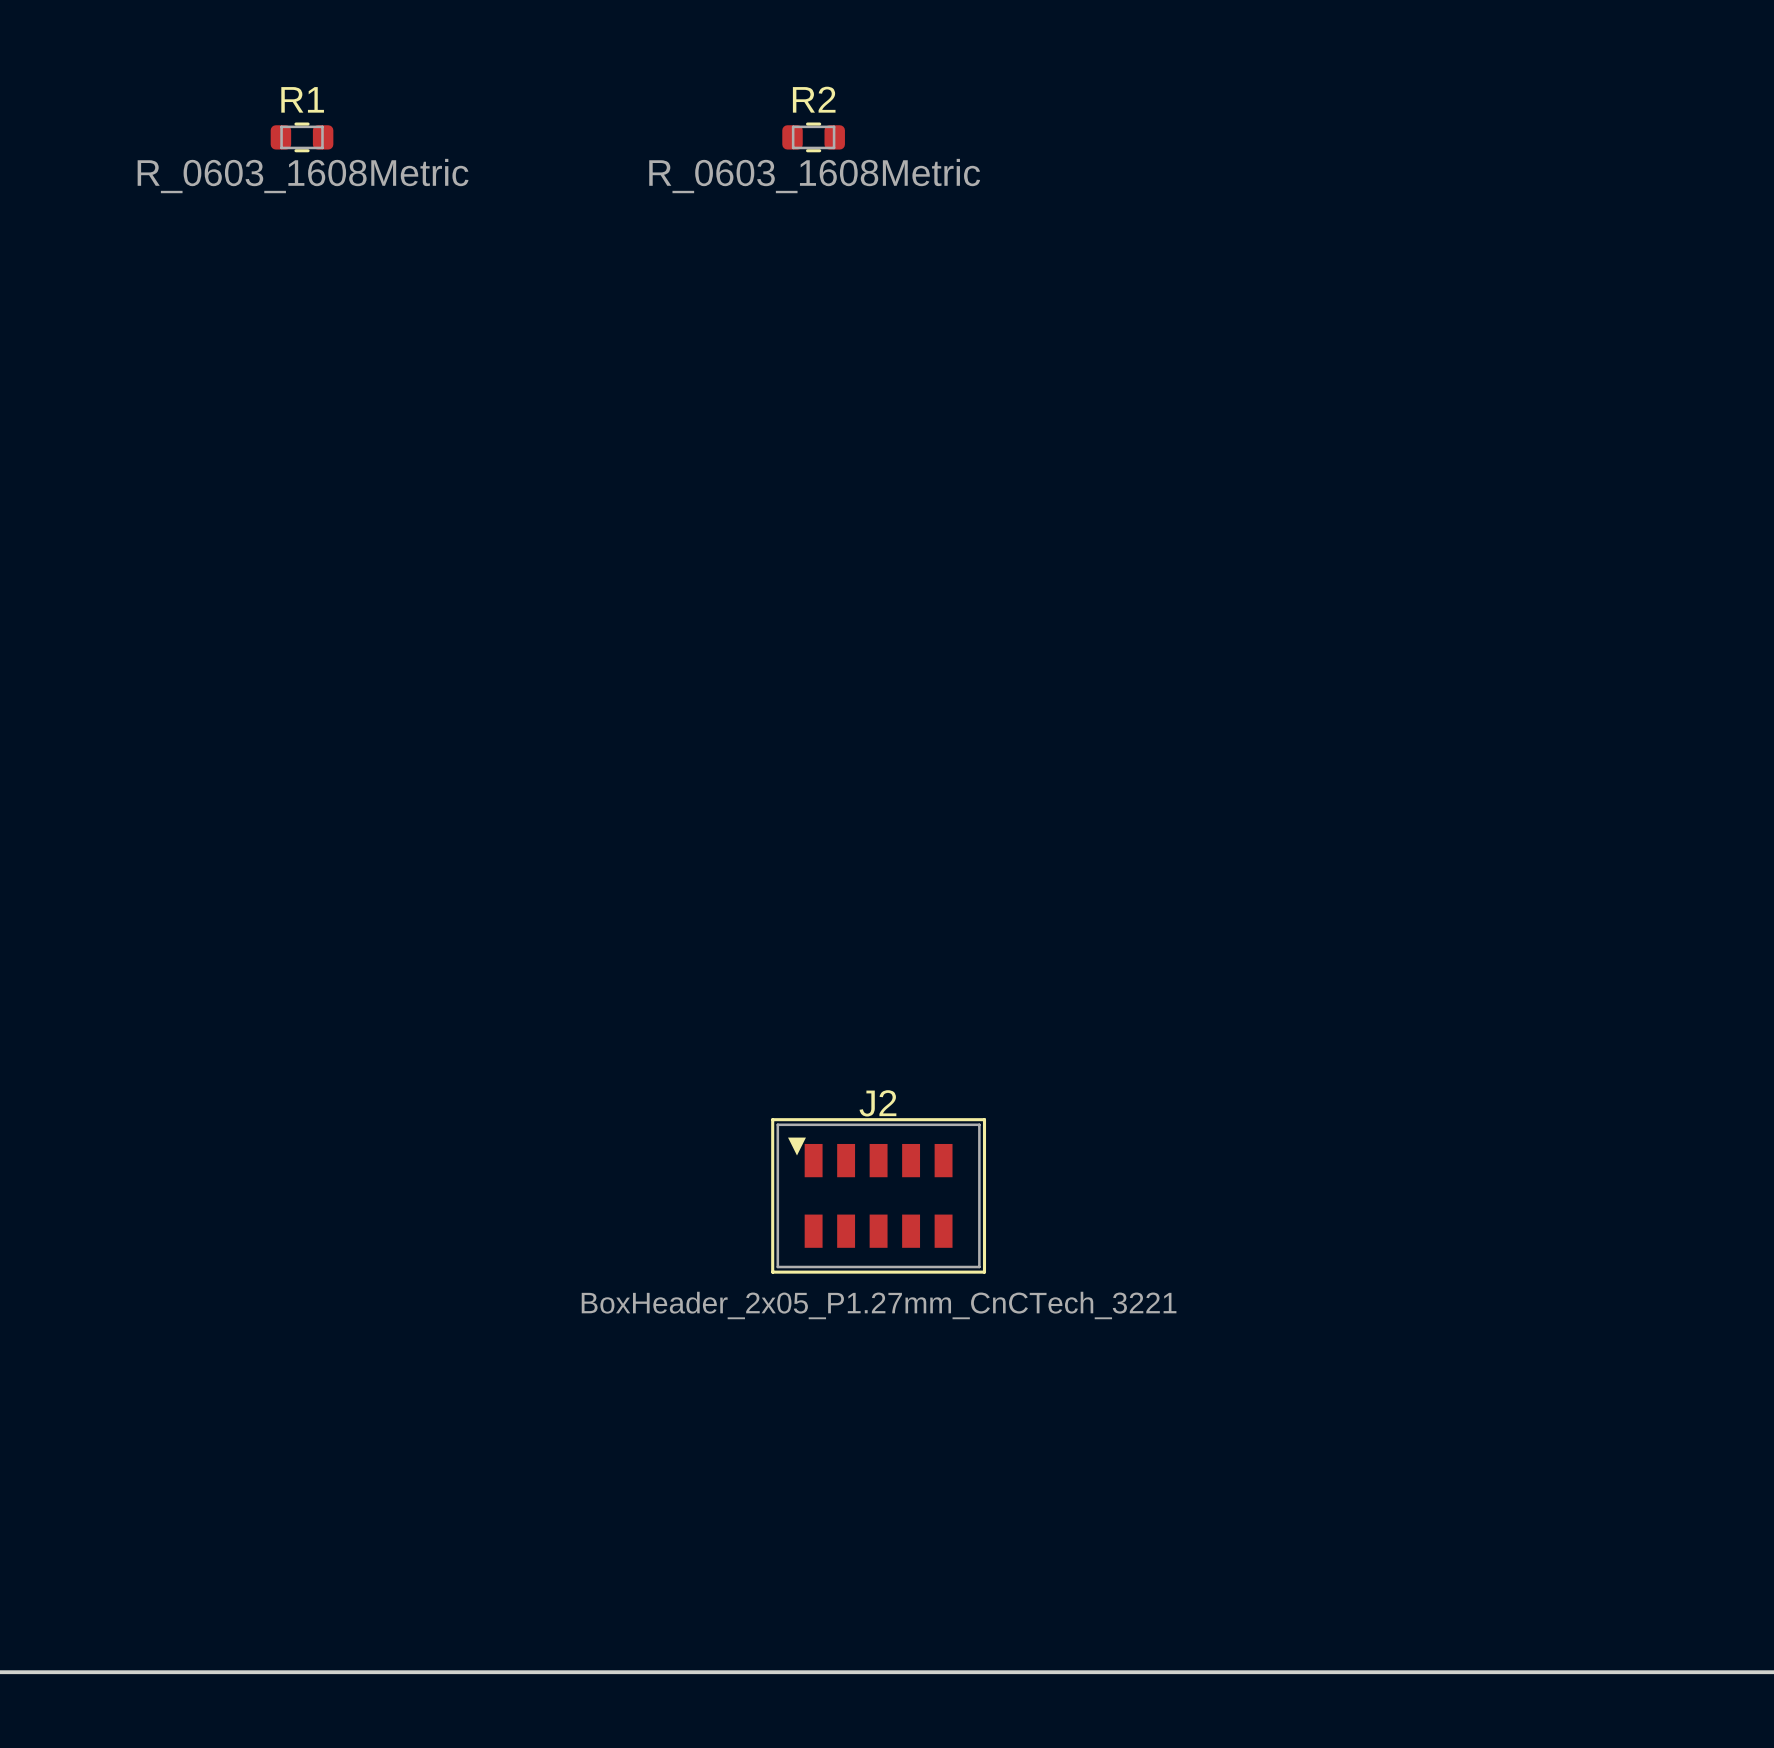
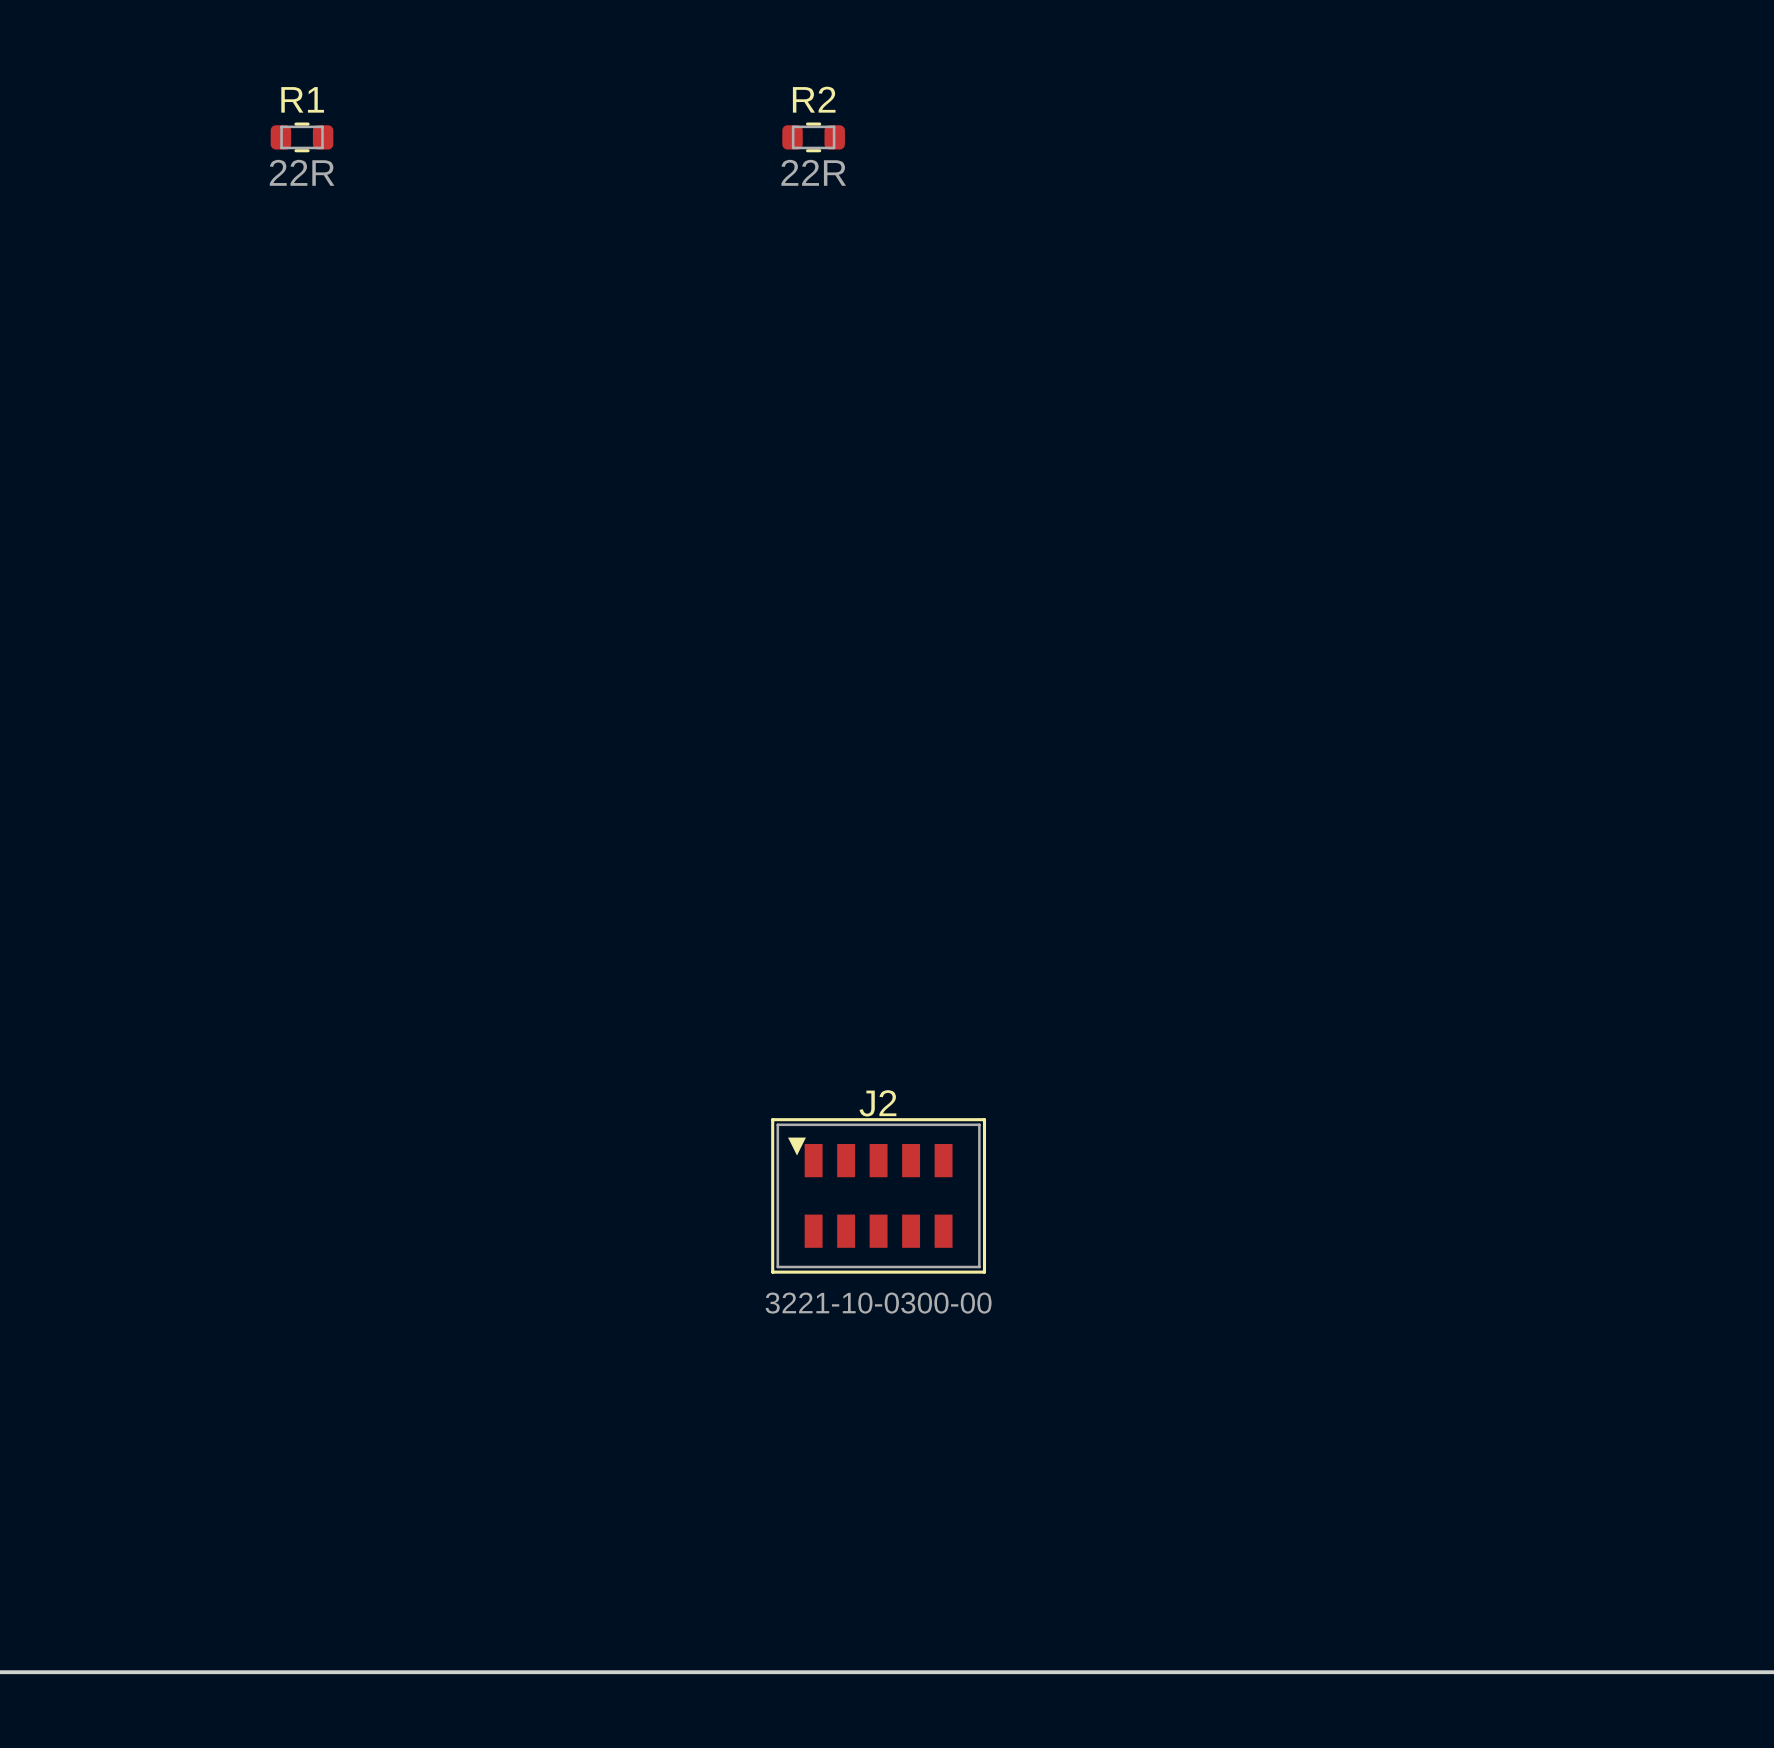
R1 value: R_0603_1608Metric (303, 176) -> 22R (302, 172)
R2 value: R_0603_1608Metric (814, 176) -> 22R (813, 172)
J2 value: BoxHeader_2x05_P1.27mm_CnCTech_3221 (879, 1305) -> 3221-10-0300-00 (878, 1303)

